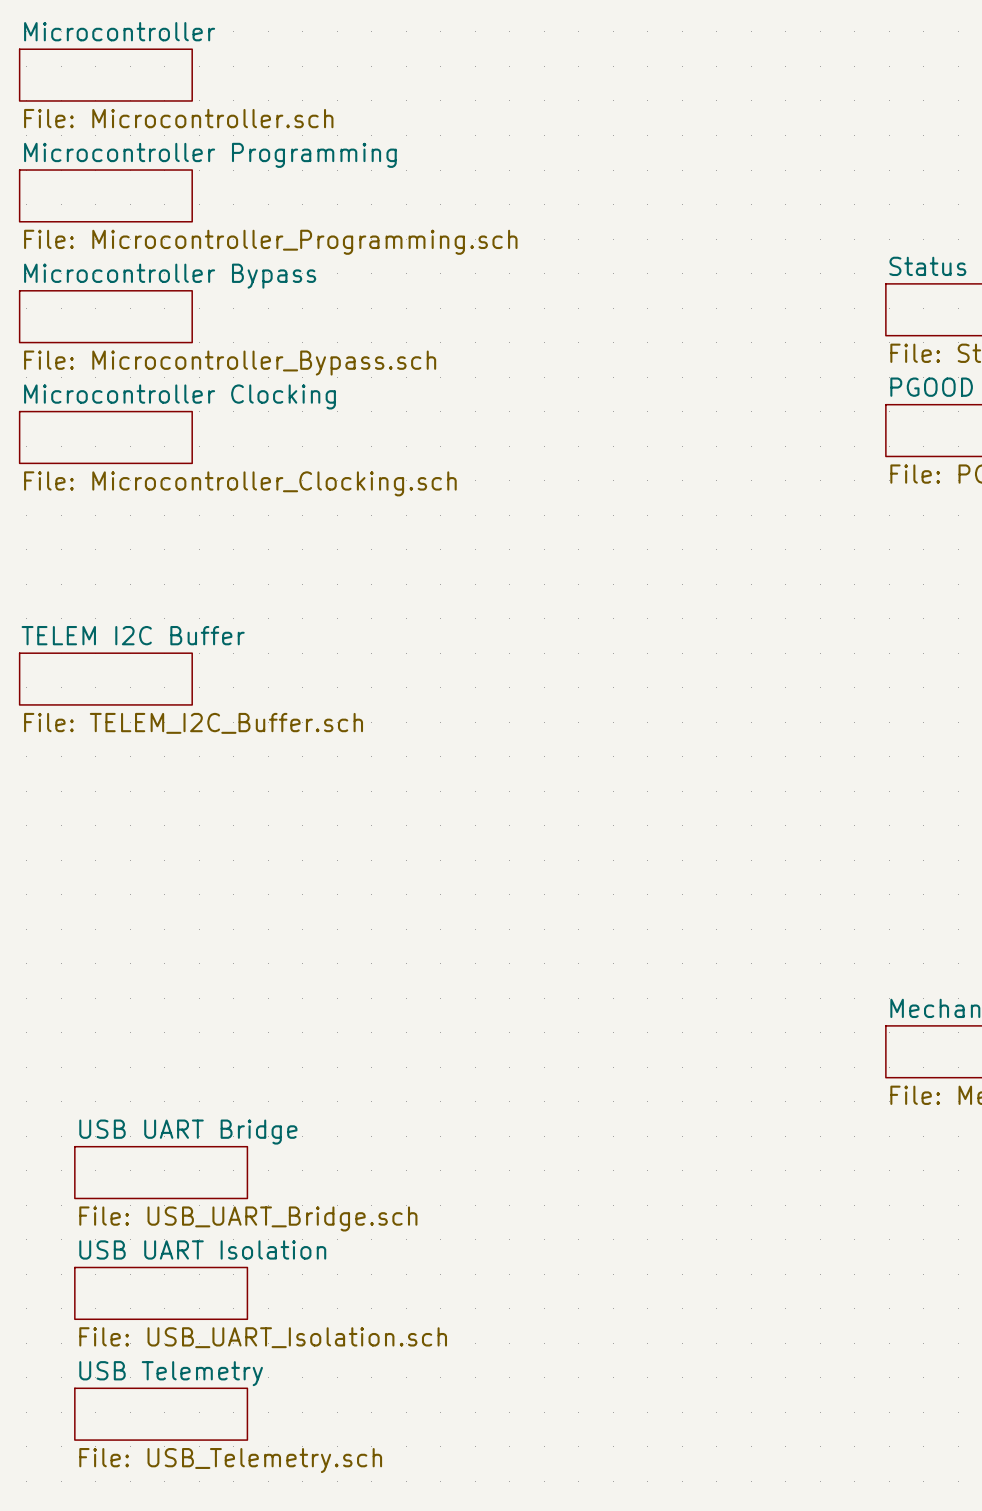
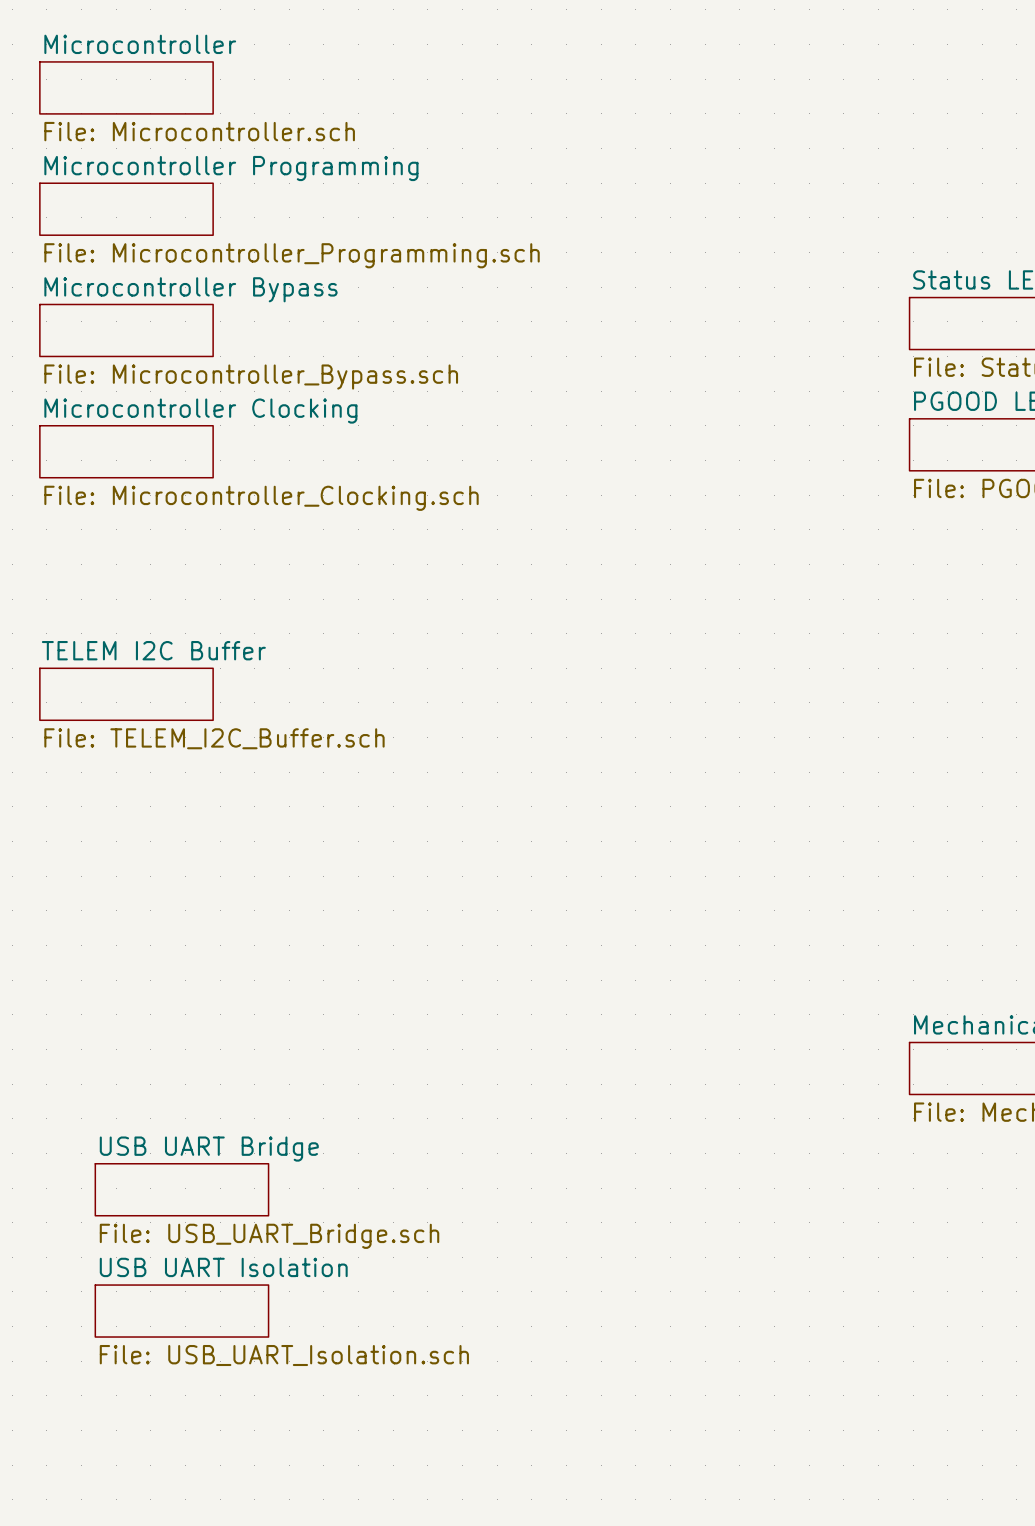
sheet USB Telemetry: File: USB_Telemetry.sch (161, 1414) -> none

